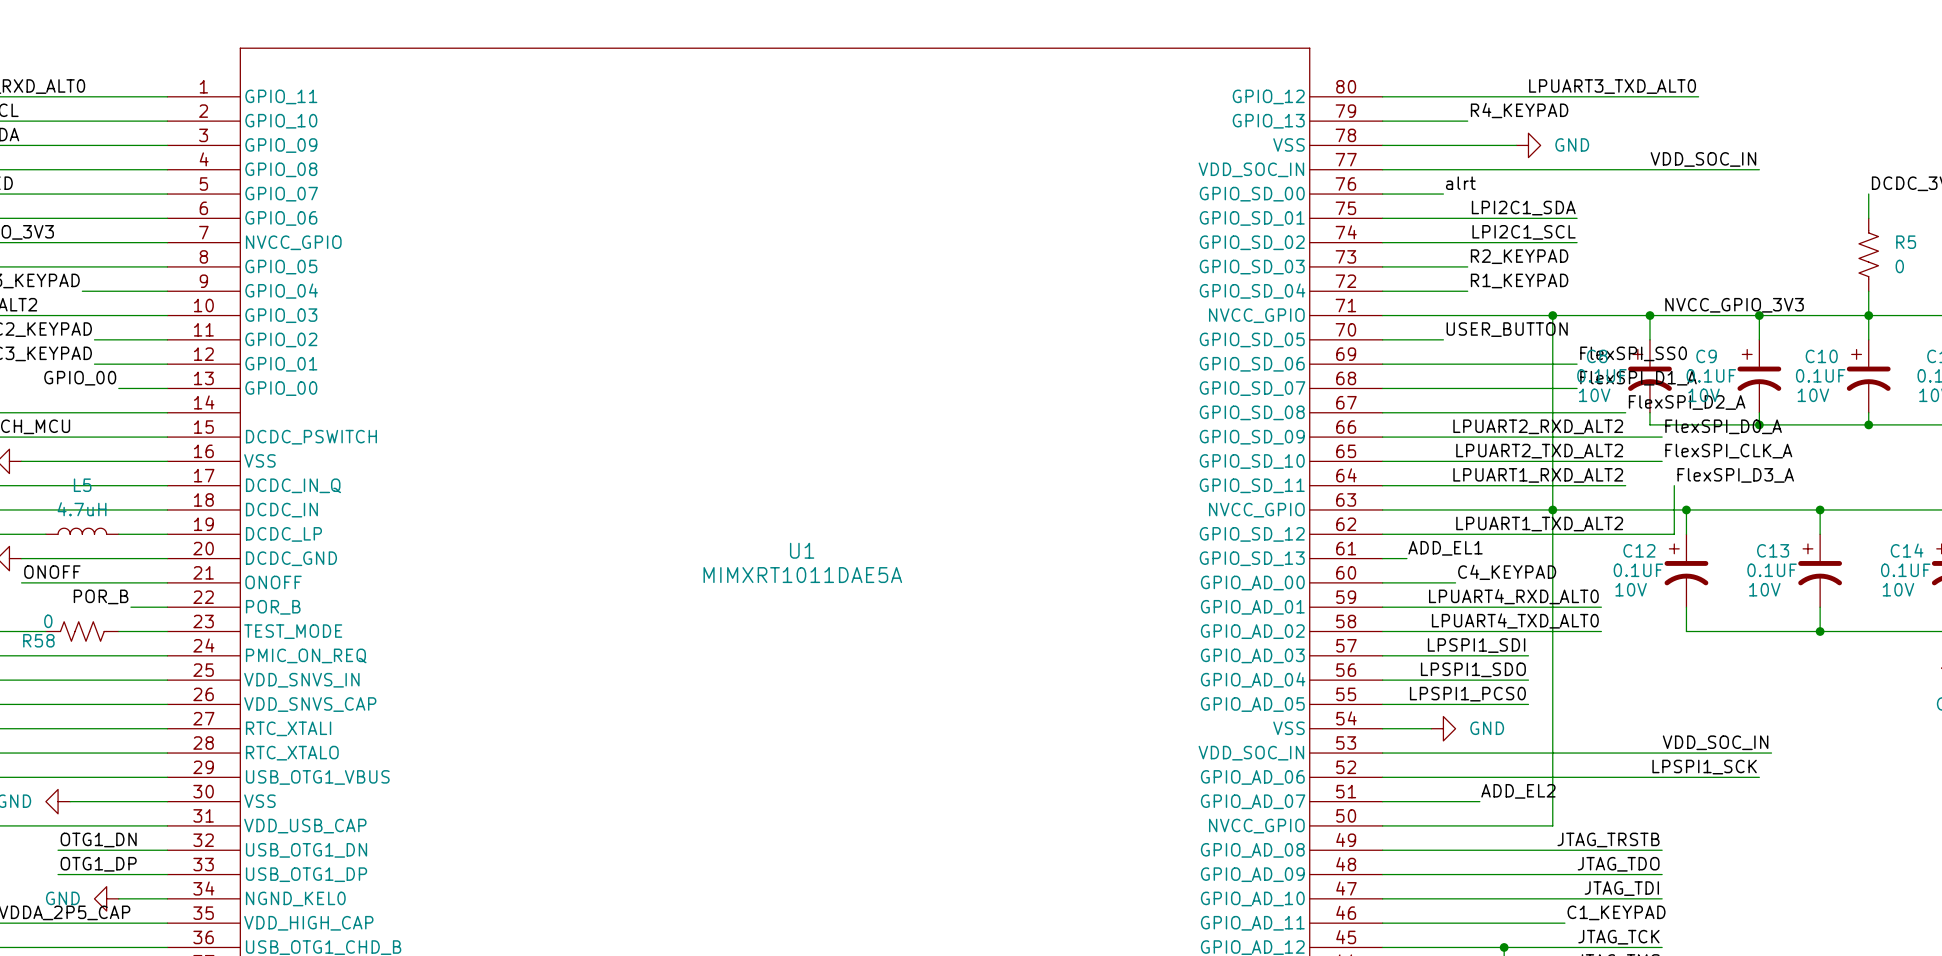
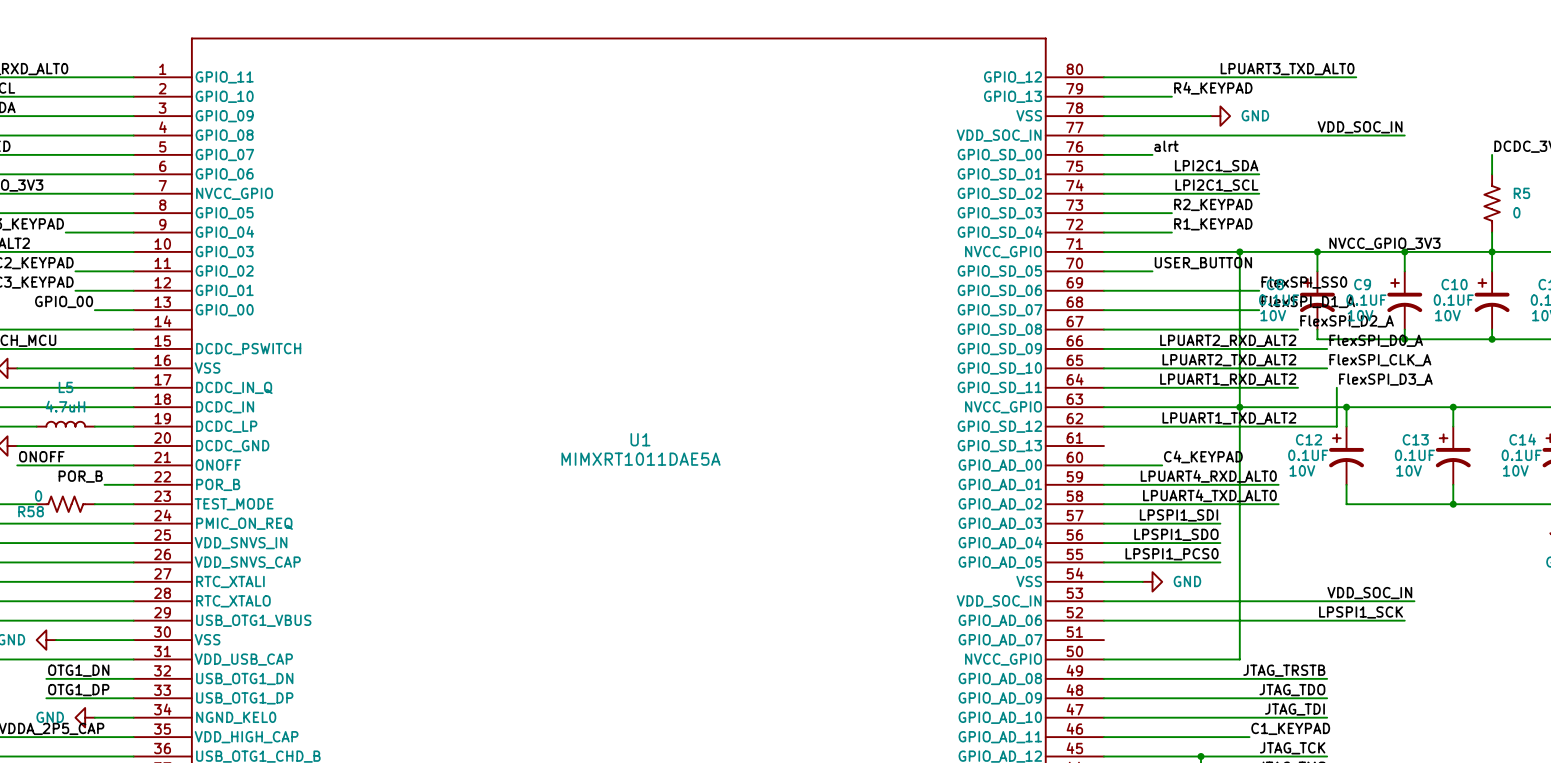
label: ADD_EL1 (1445, 548) -> none
wire: (1382, 558) (1406, 558) -> none
label: ADD_EL2 (1518, 791) -> none
wire: (1382, 801) (1479, 801) -> none

